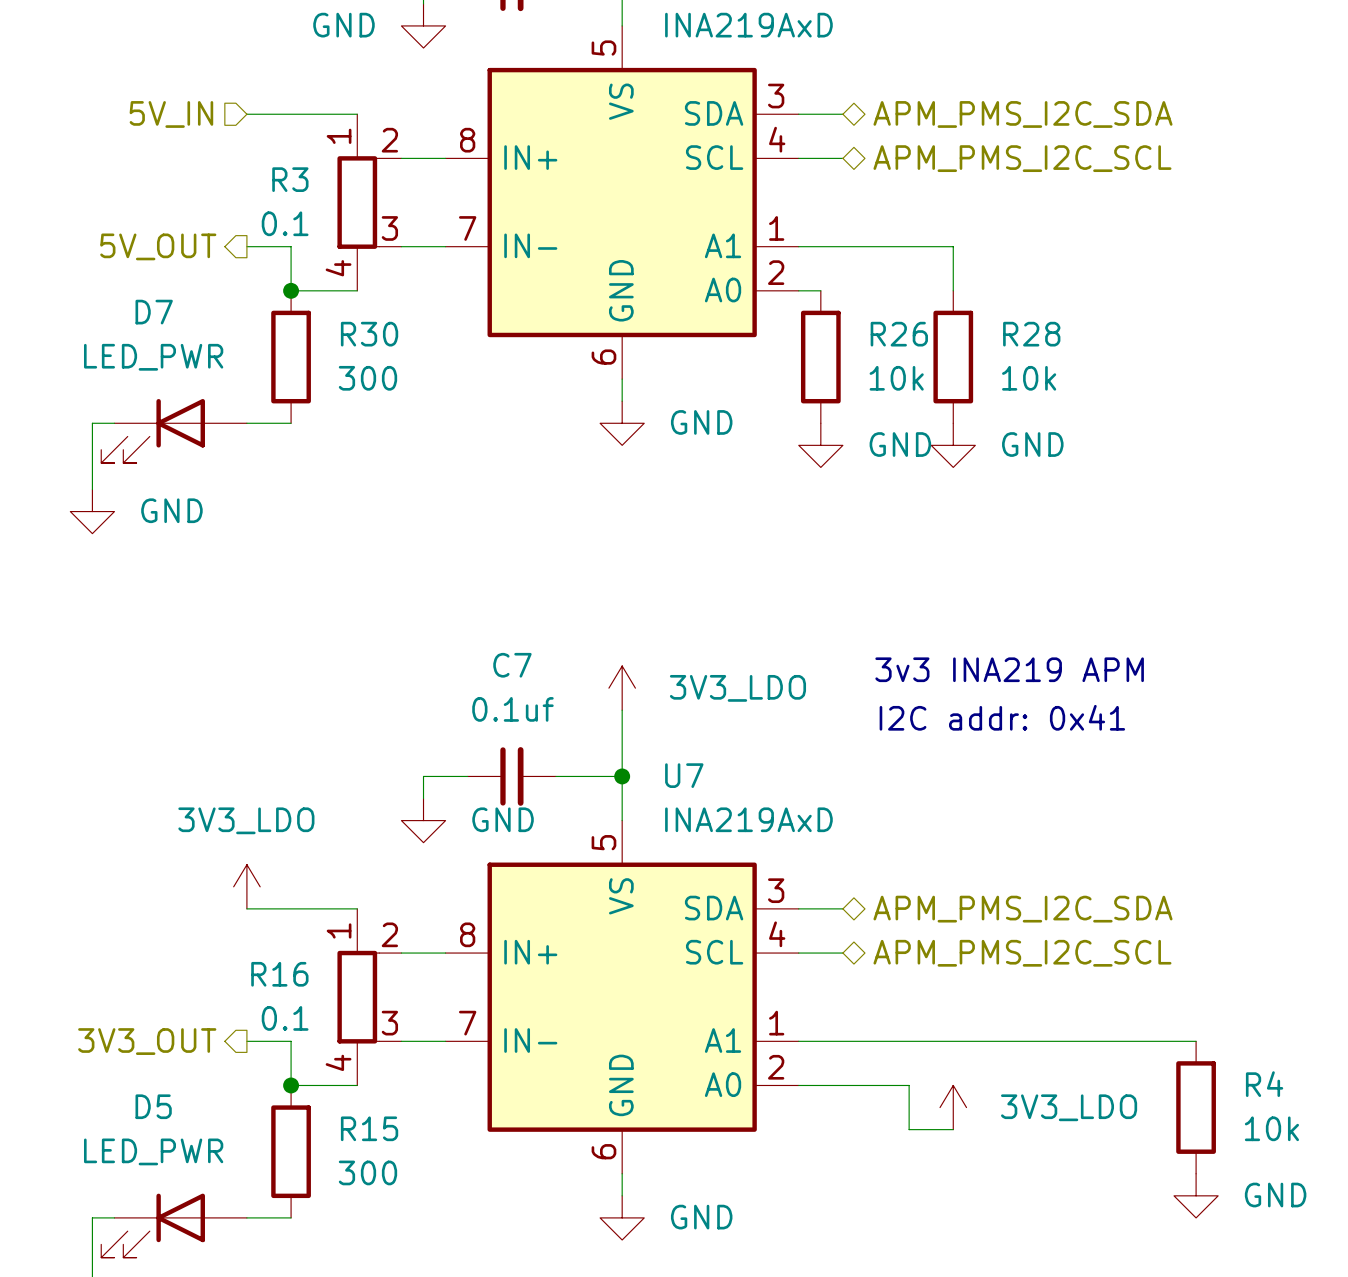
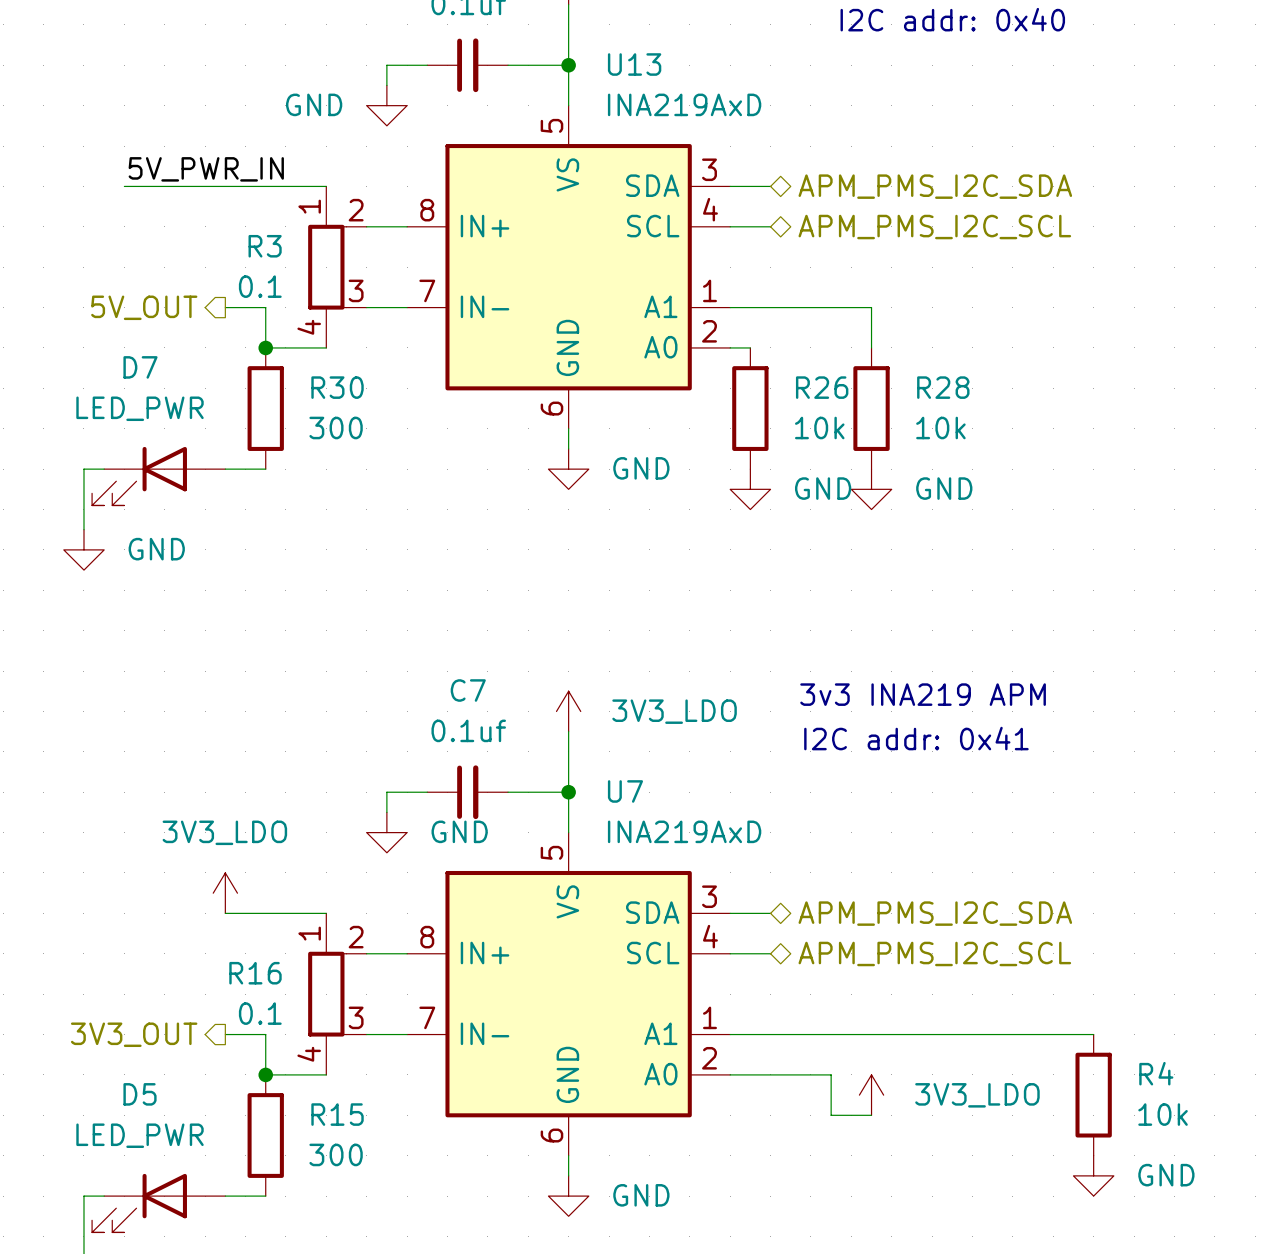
label: none -> 5V_PWR_IN (206, 169)
wire: none -> (124, 186) (225, 186)
hierarchical label: 5V_IN (171, 114) -> none

